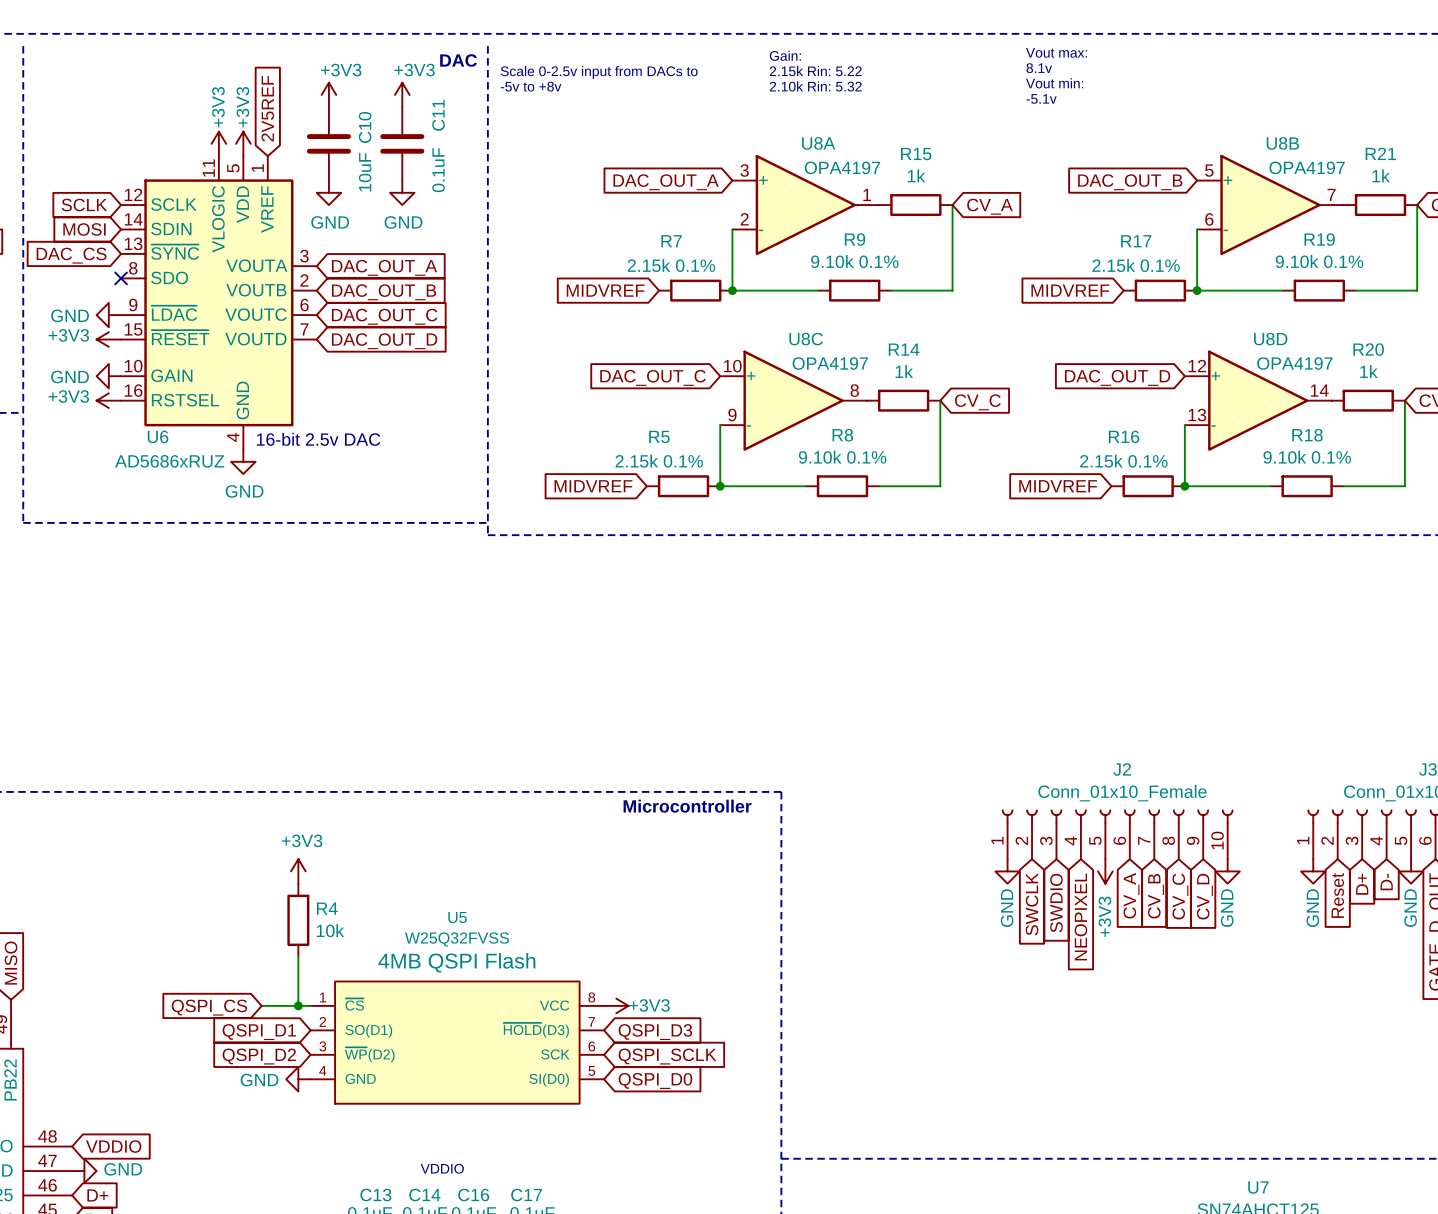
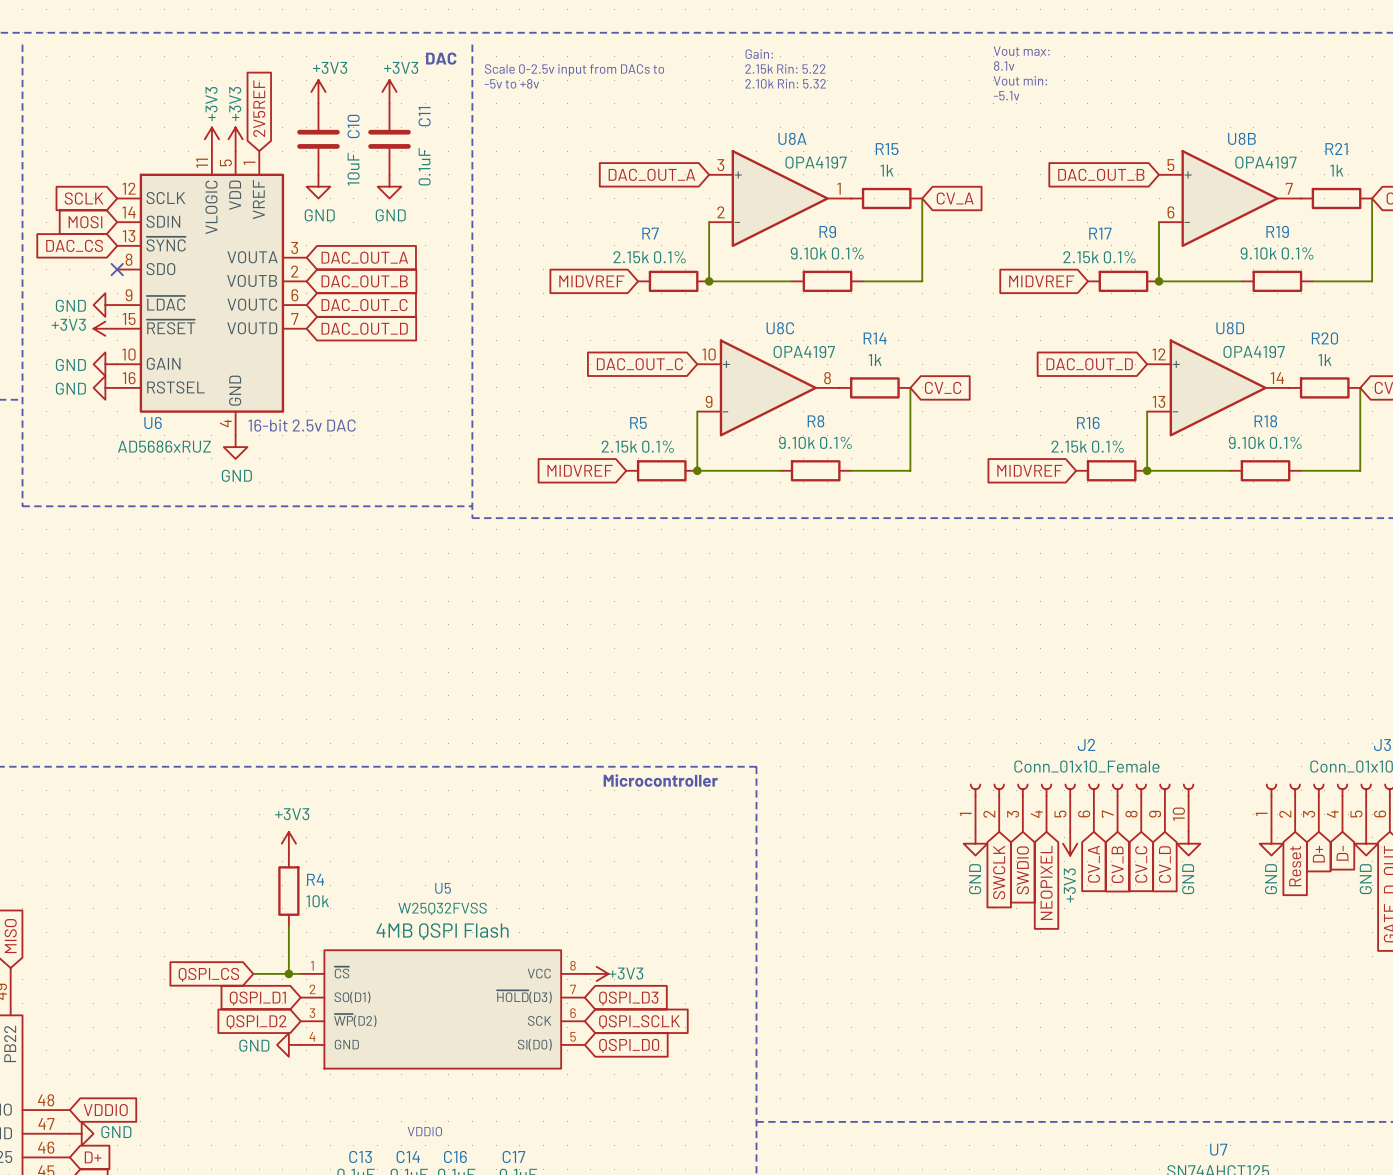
power symbol: +3V3 (108, 400) -> GND (105, 387)

